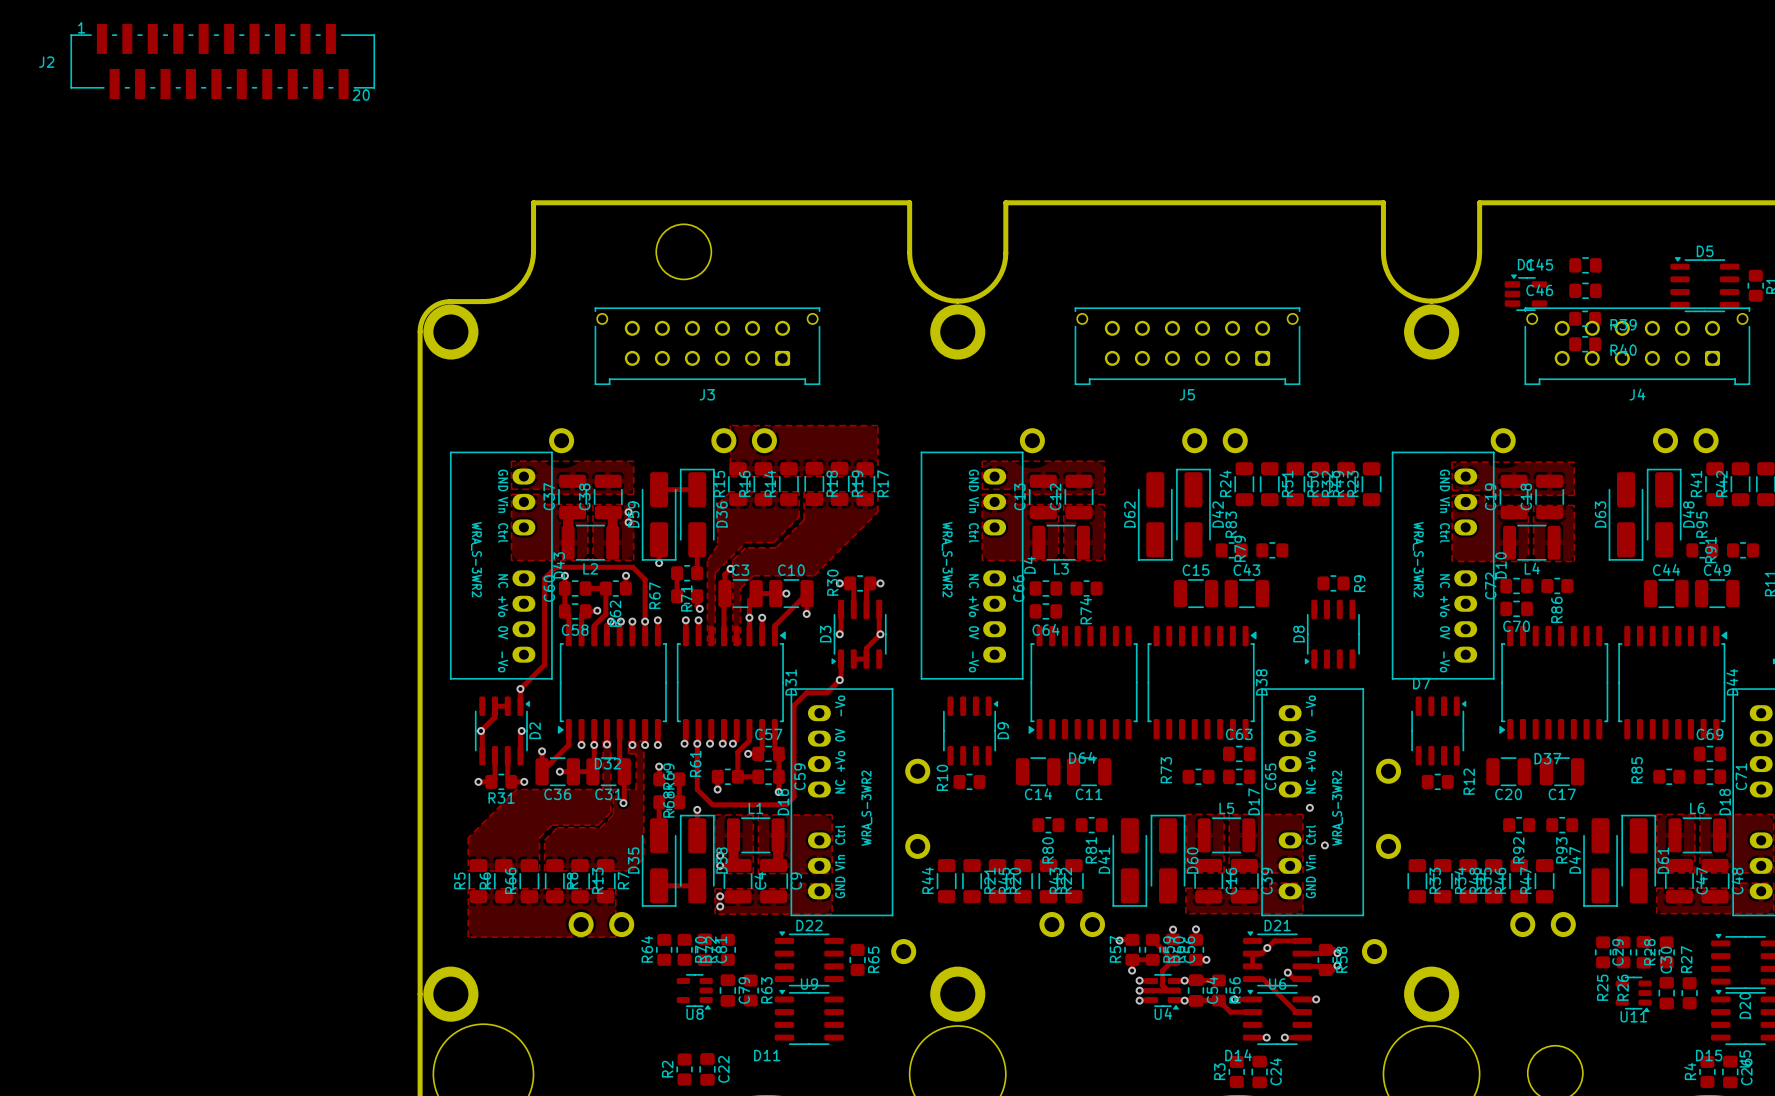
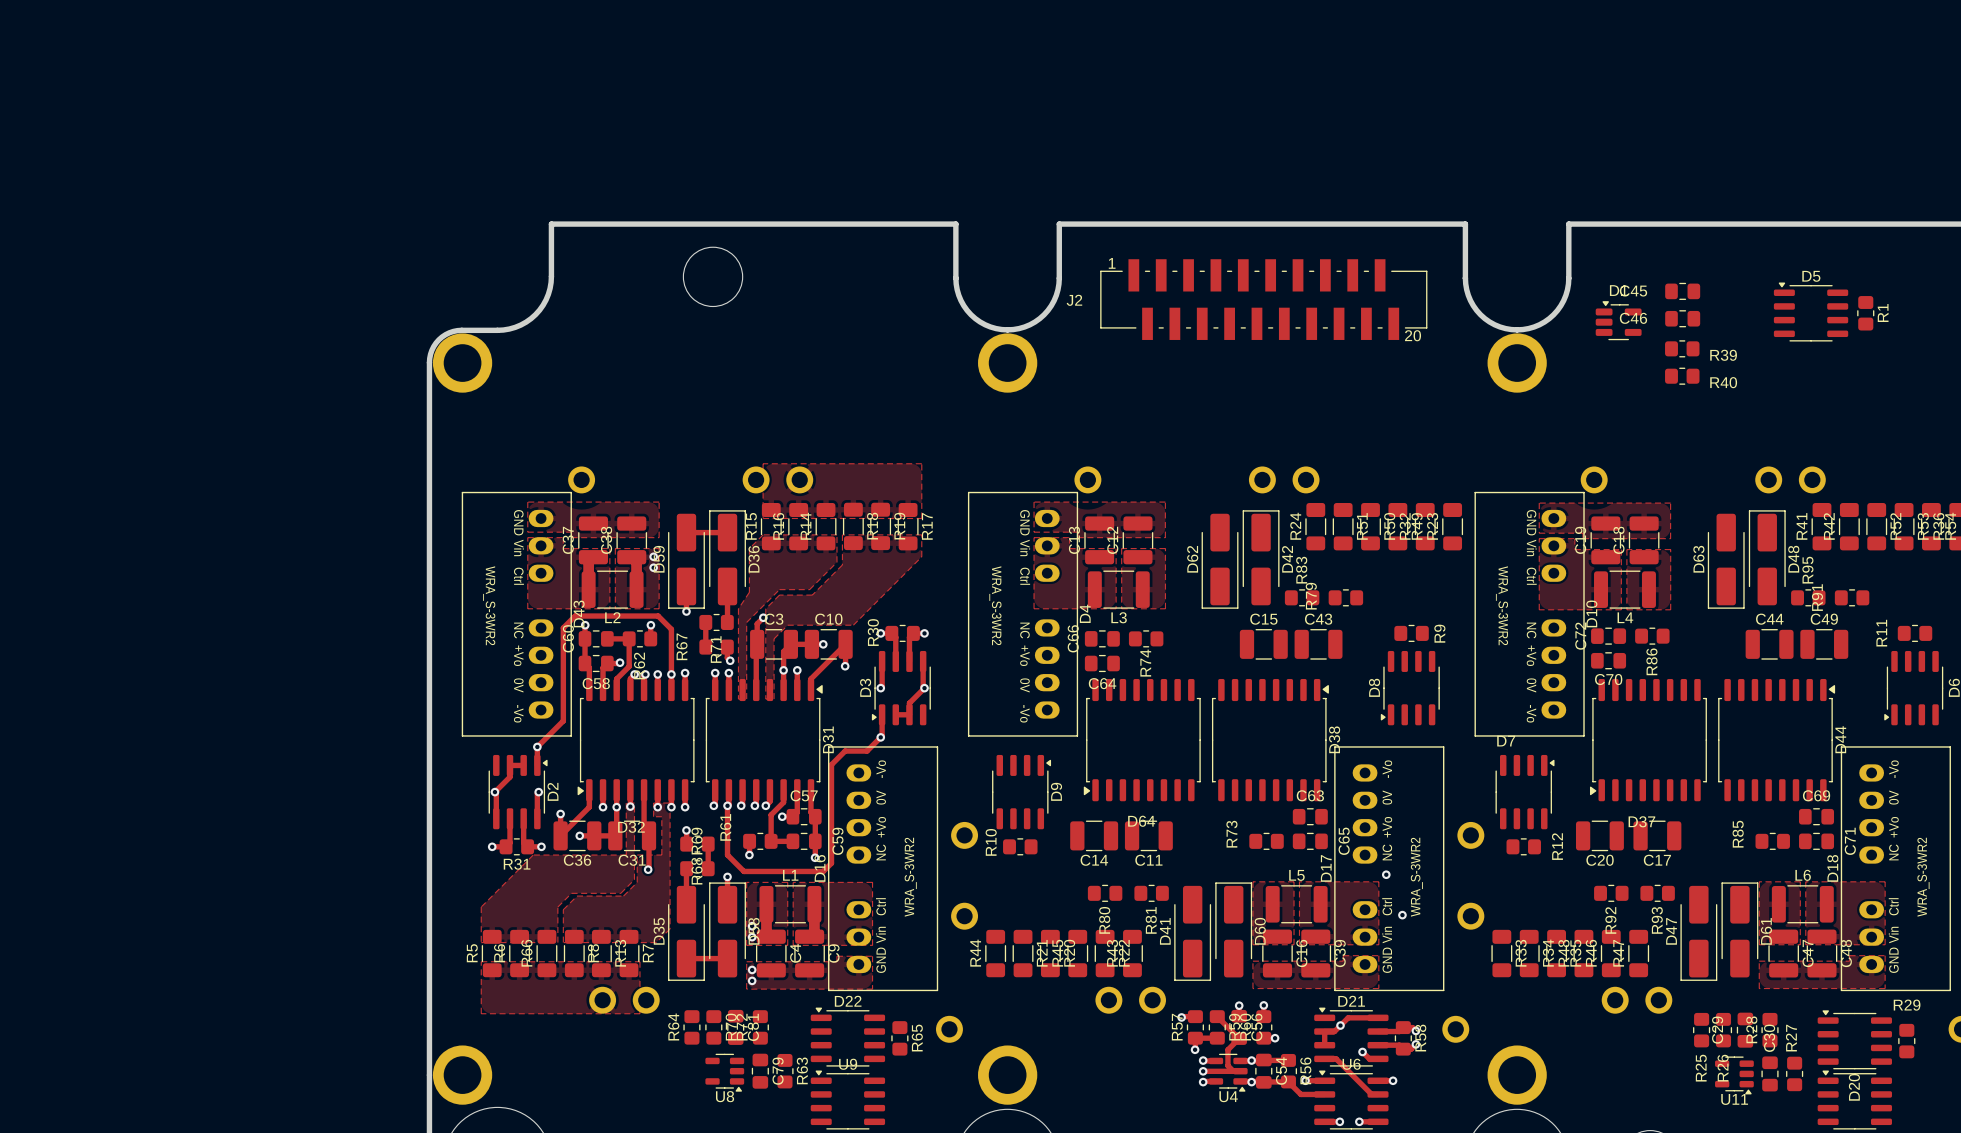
J2 position: (222, 61) -> (1263, 299)
J3: (707, 346) -> none
J5: (1187, 346) -> none
J4: (1637, 346) -> none

